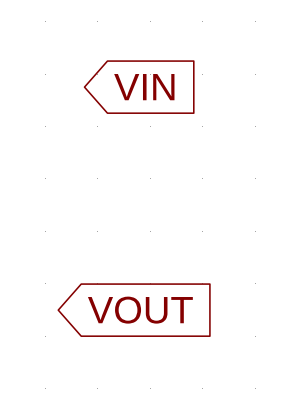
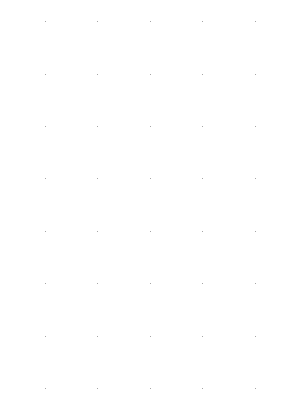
global label: VIN (144, 87) -> none
global label: VOUT (140, 310) -> none

